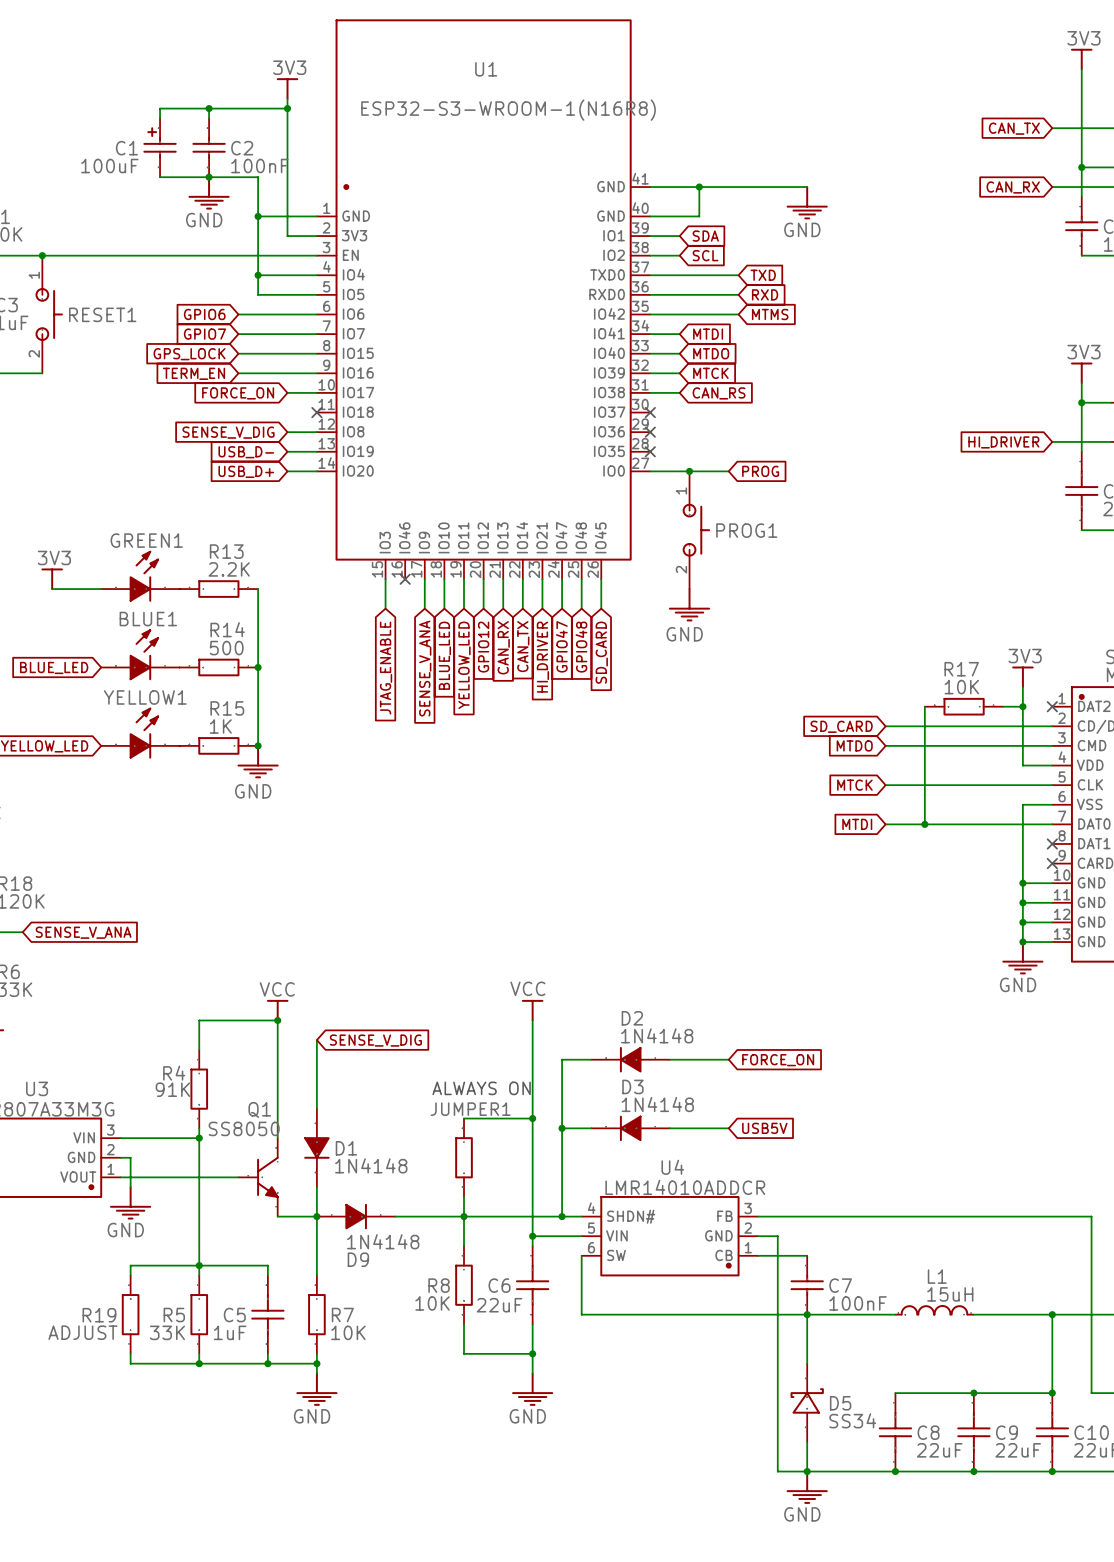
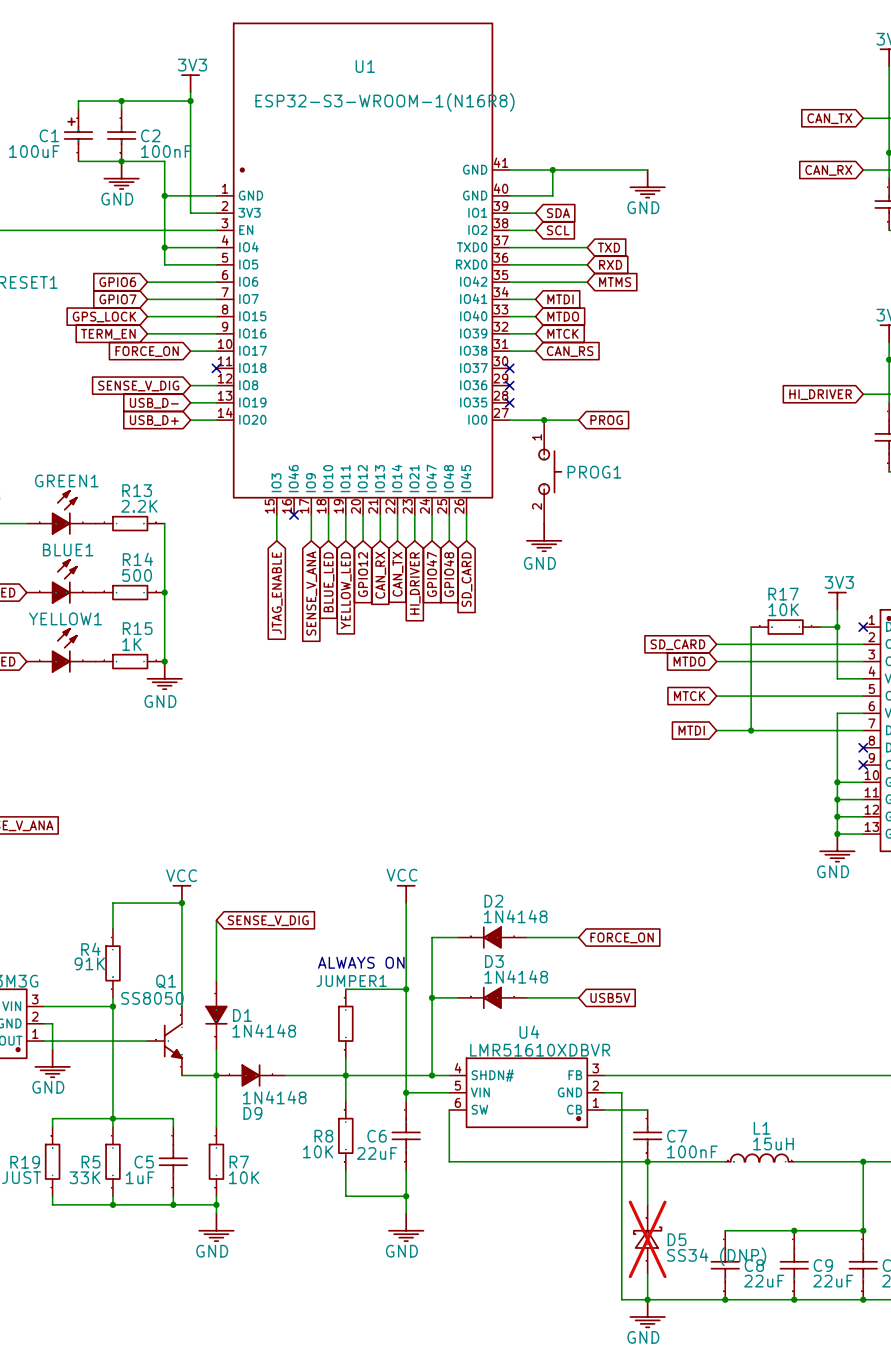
U4 value: LMR14010ADDCR (685, 1187) -> LMR51610XDBVR (540, 1050)
D5 do-not-place cross: none -> (647, 1239)
D5 value: SS34 (852, 1420) -> SS34 (DNP) (716, 1256)

